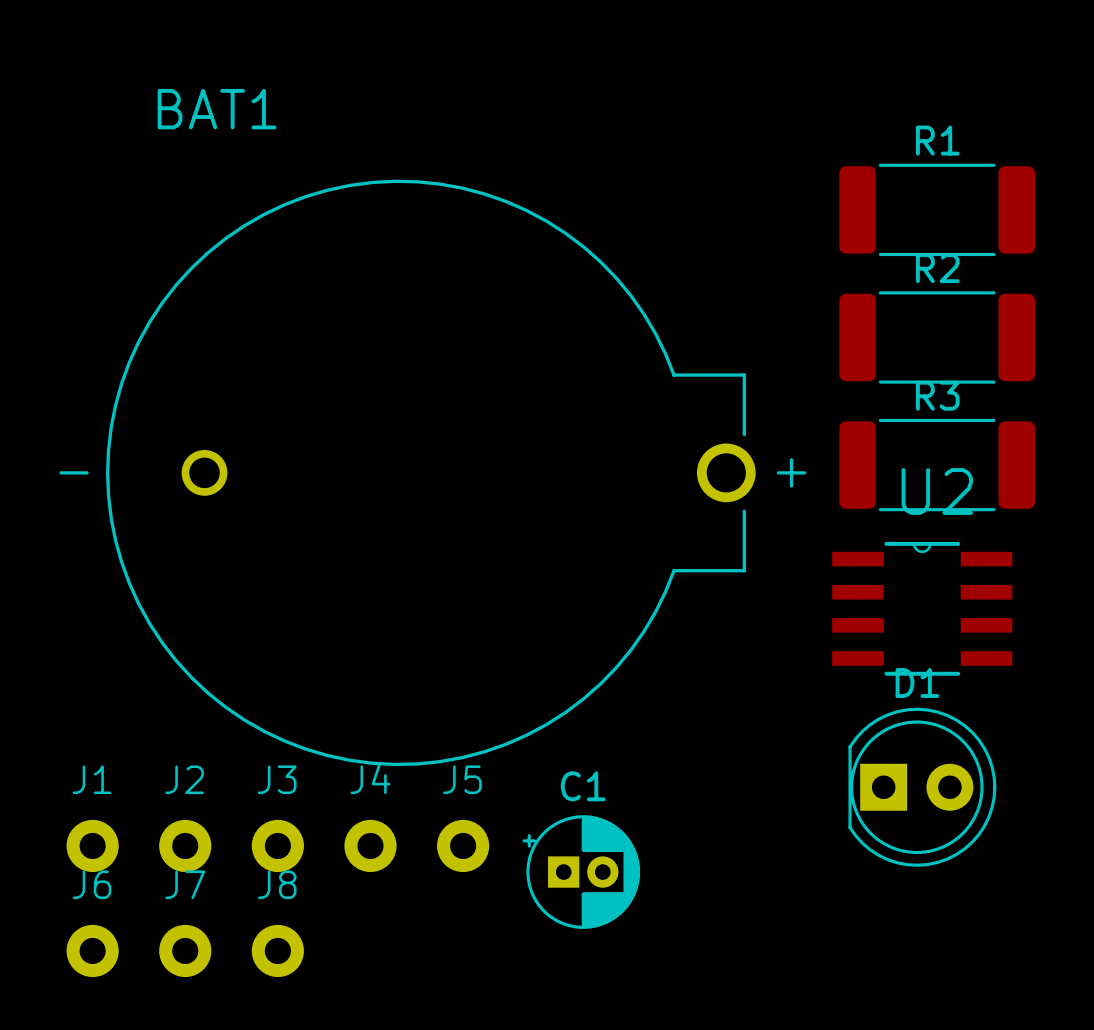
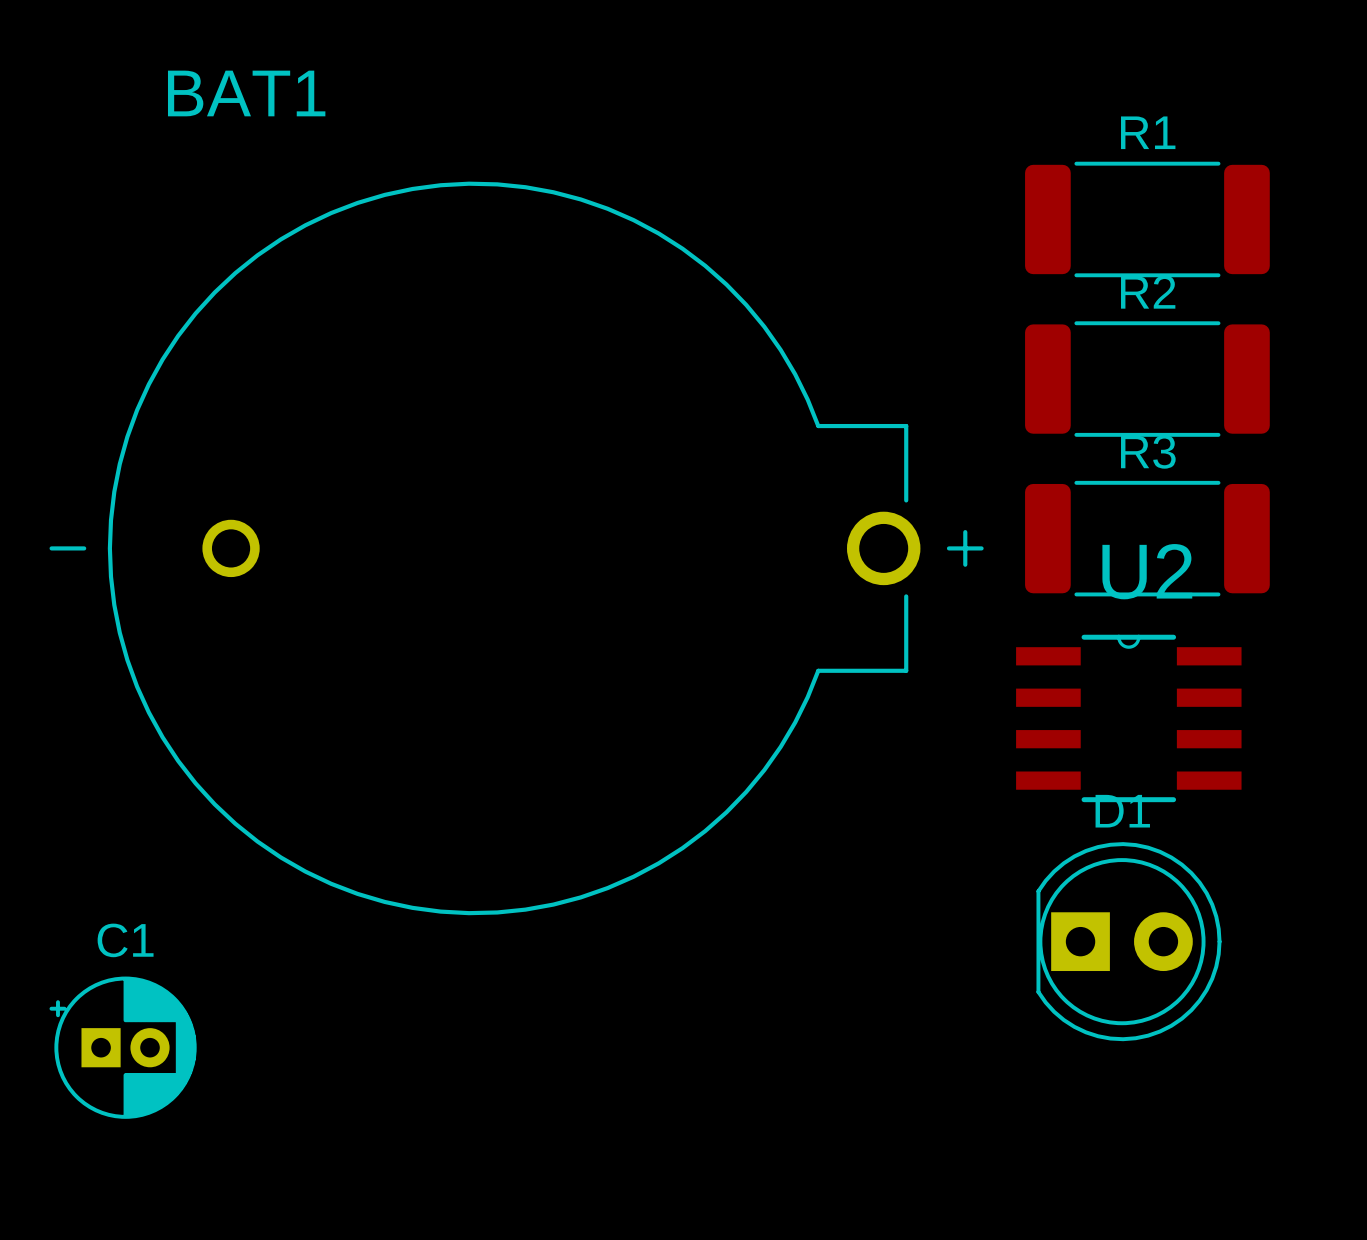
J1: (92, 845) -> none
J2: (185, 845) -> none
J3: (277, 845) -> none
J4: (370, 845) -> none
J5: (463, 845) -> none
C1 position: (581, 872) -> (123, 1047)
J6: (92, 950) -> none
J7: (185, 950) -> none
J8: (277, 950) -> none

